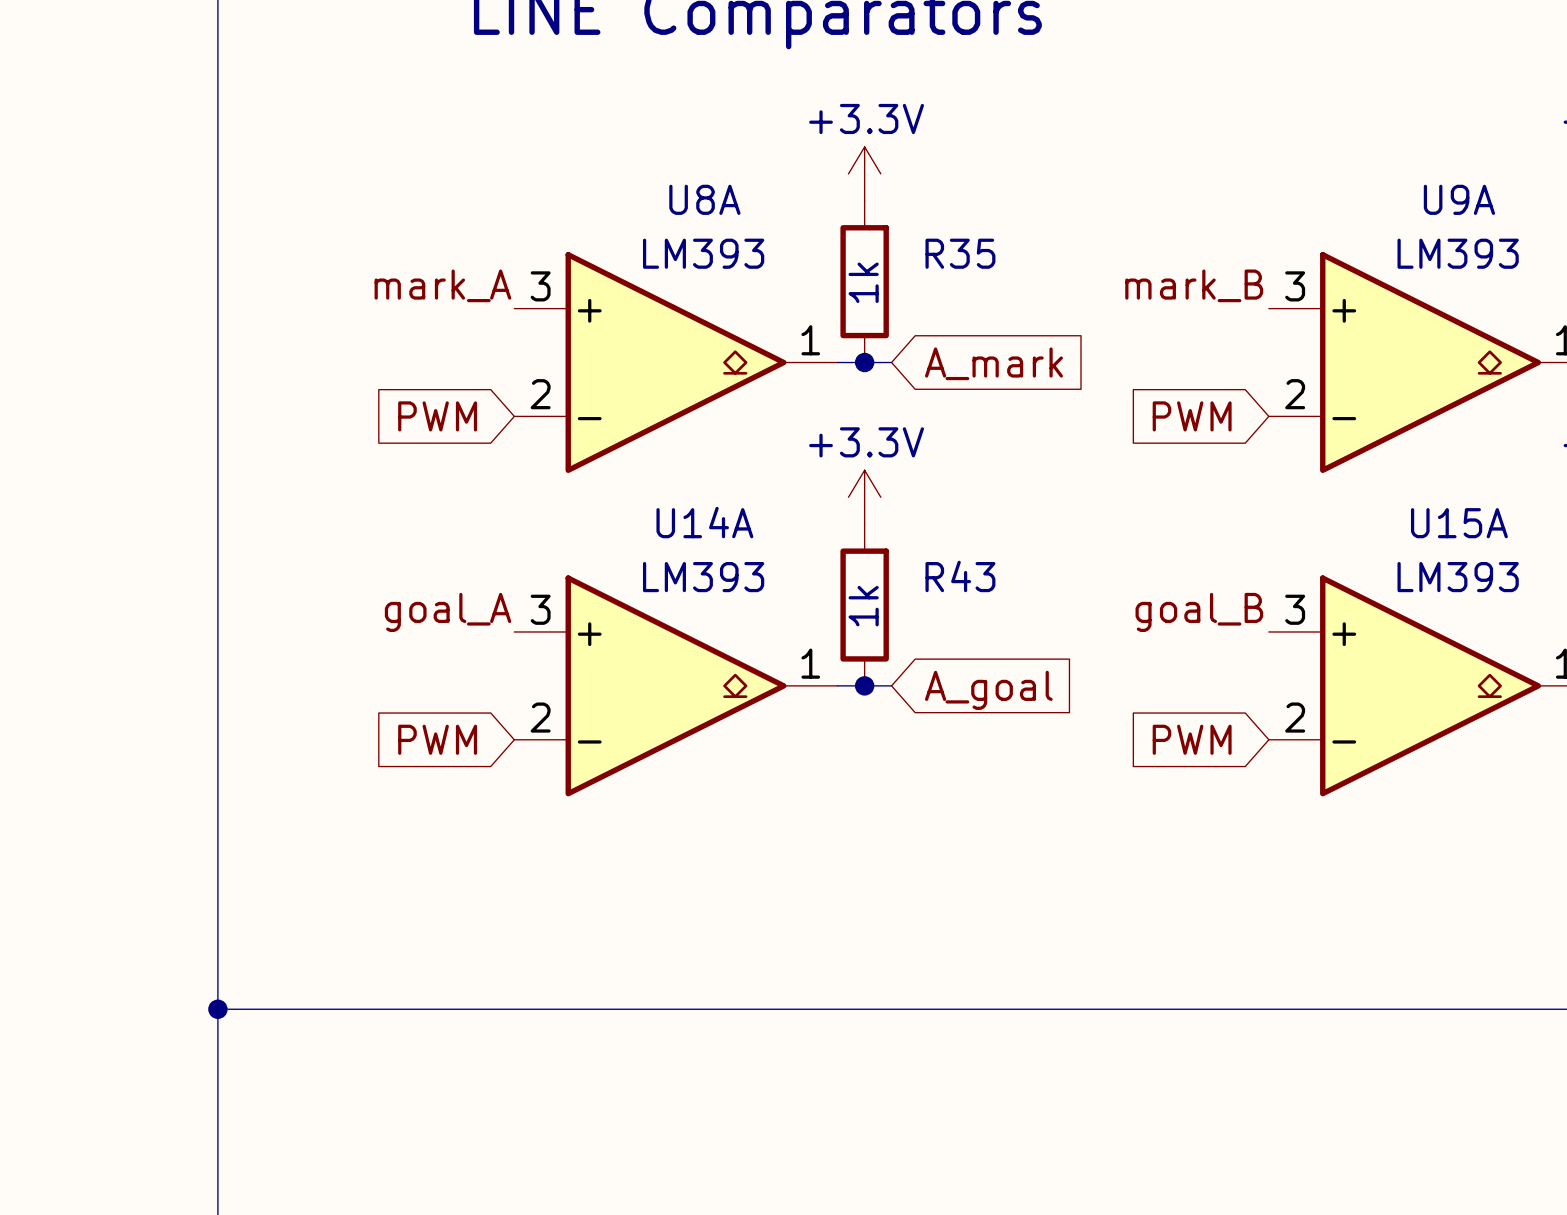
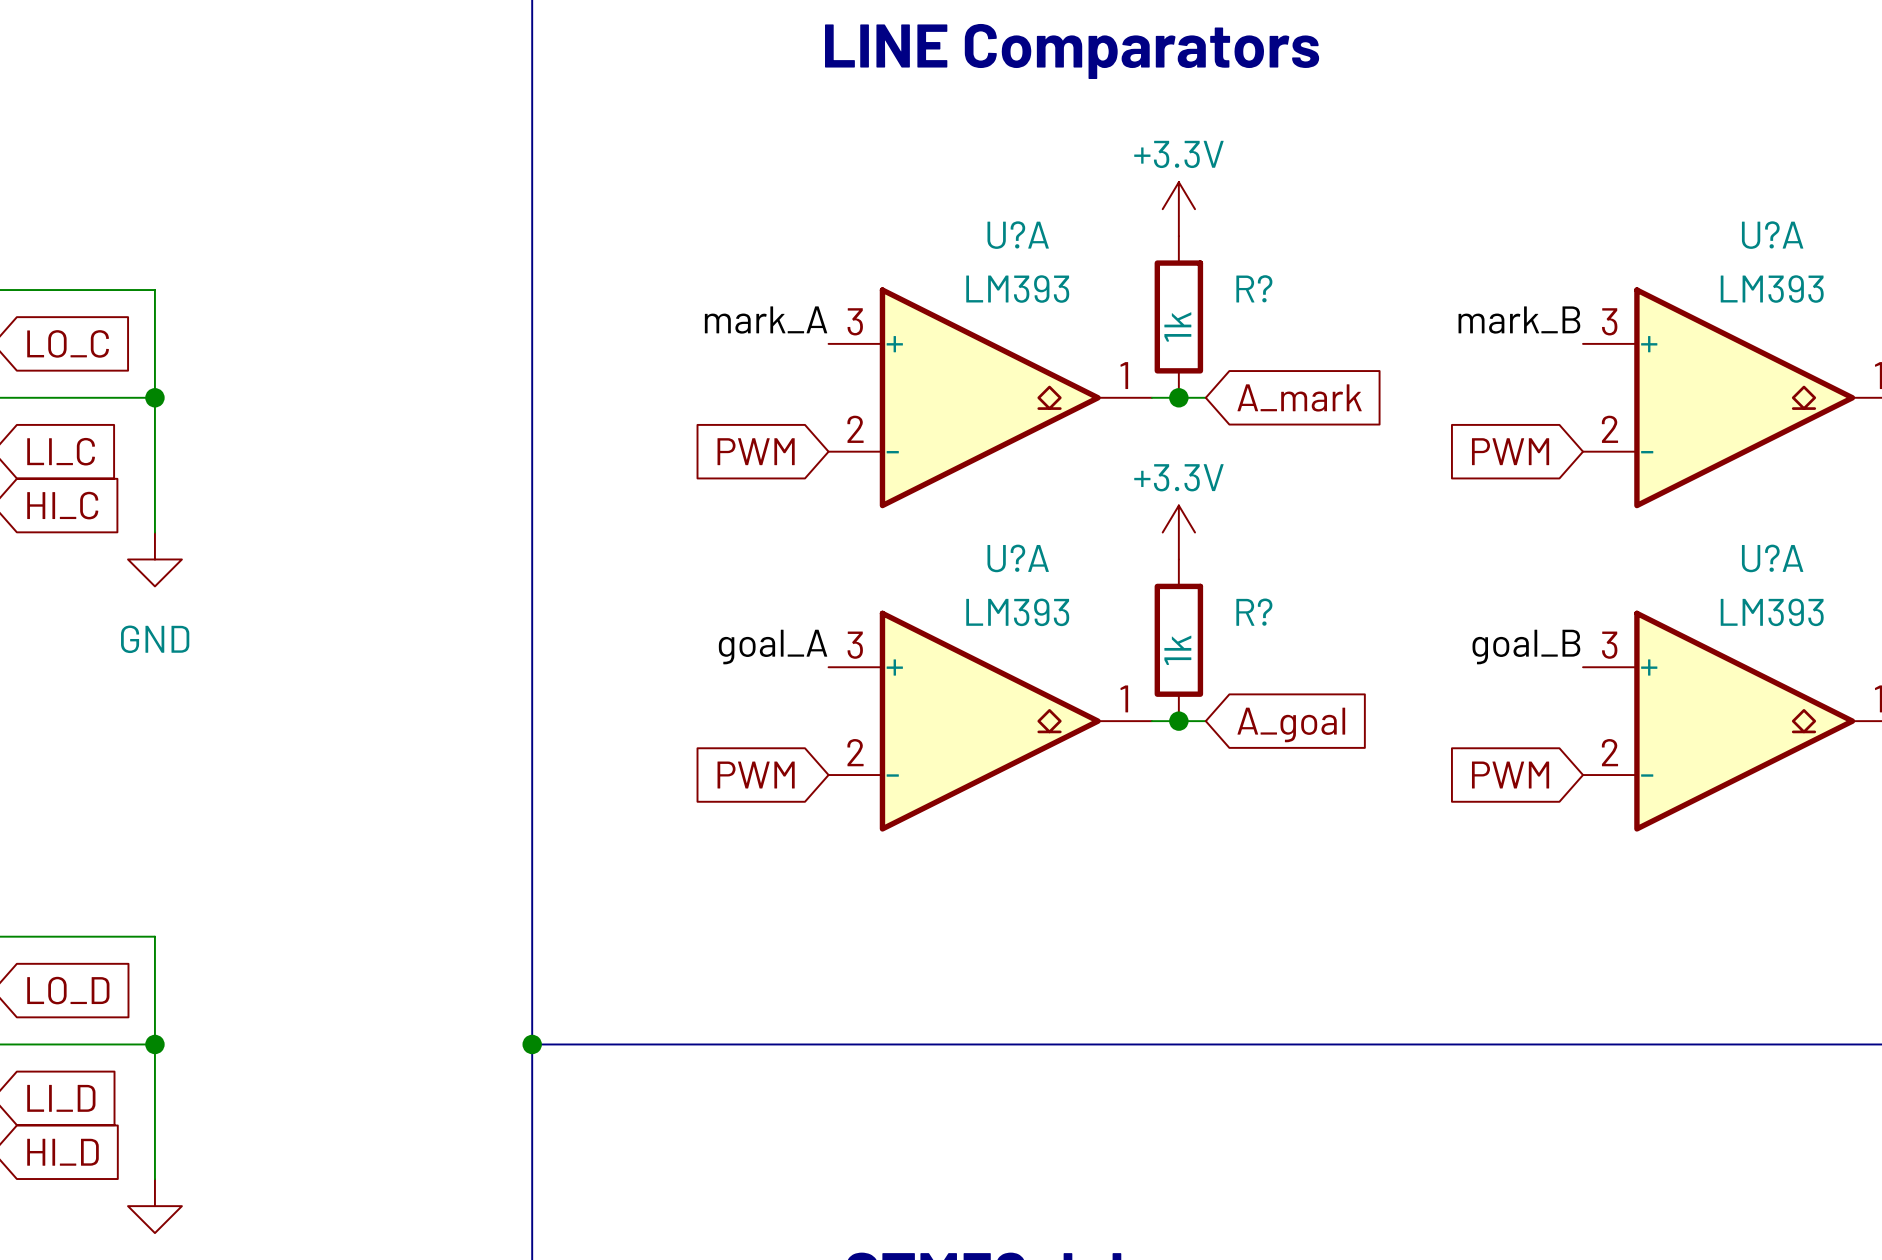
U8A name: U8A (704, 199) -> U?A (1018, 235)
U9A name: U9A (1459, 199) -> U?A (1772, 235)
R35 name: R35 (960, 253) -> R? (1254, 288)
U14A name: U14A (704, 522) -> U?A (1018, 558)
U15A name: U15A (1459, 523) -> U?A (1772, 558)
R43 name: R43 (960, 576) -> R? (1254, 612)

